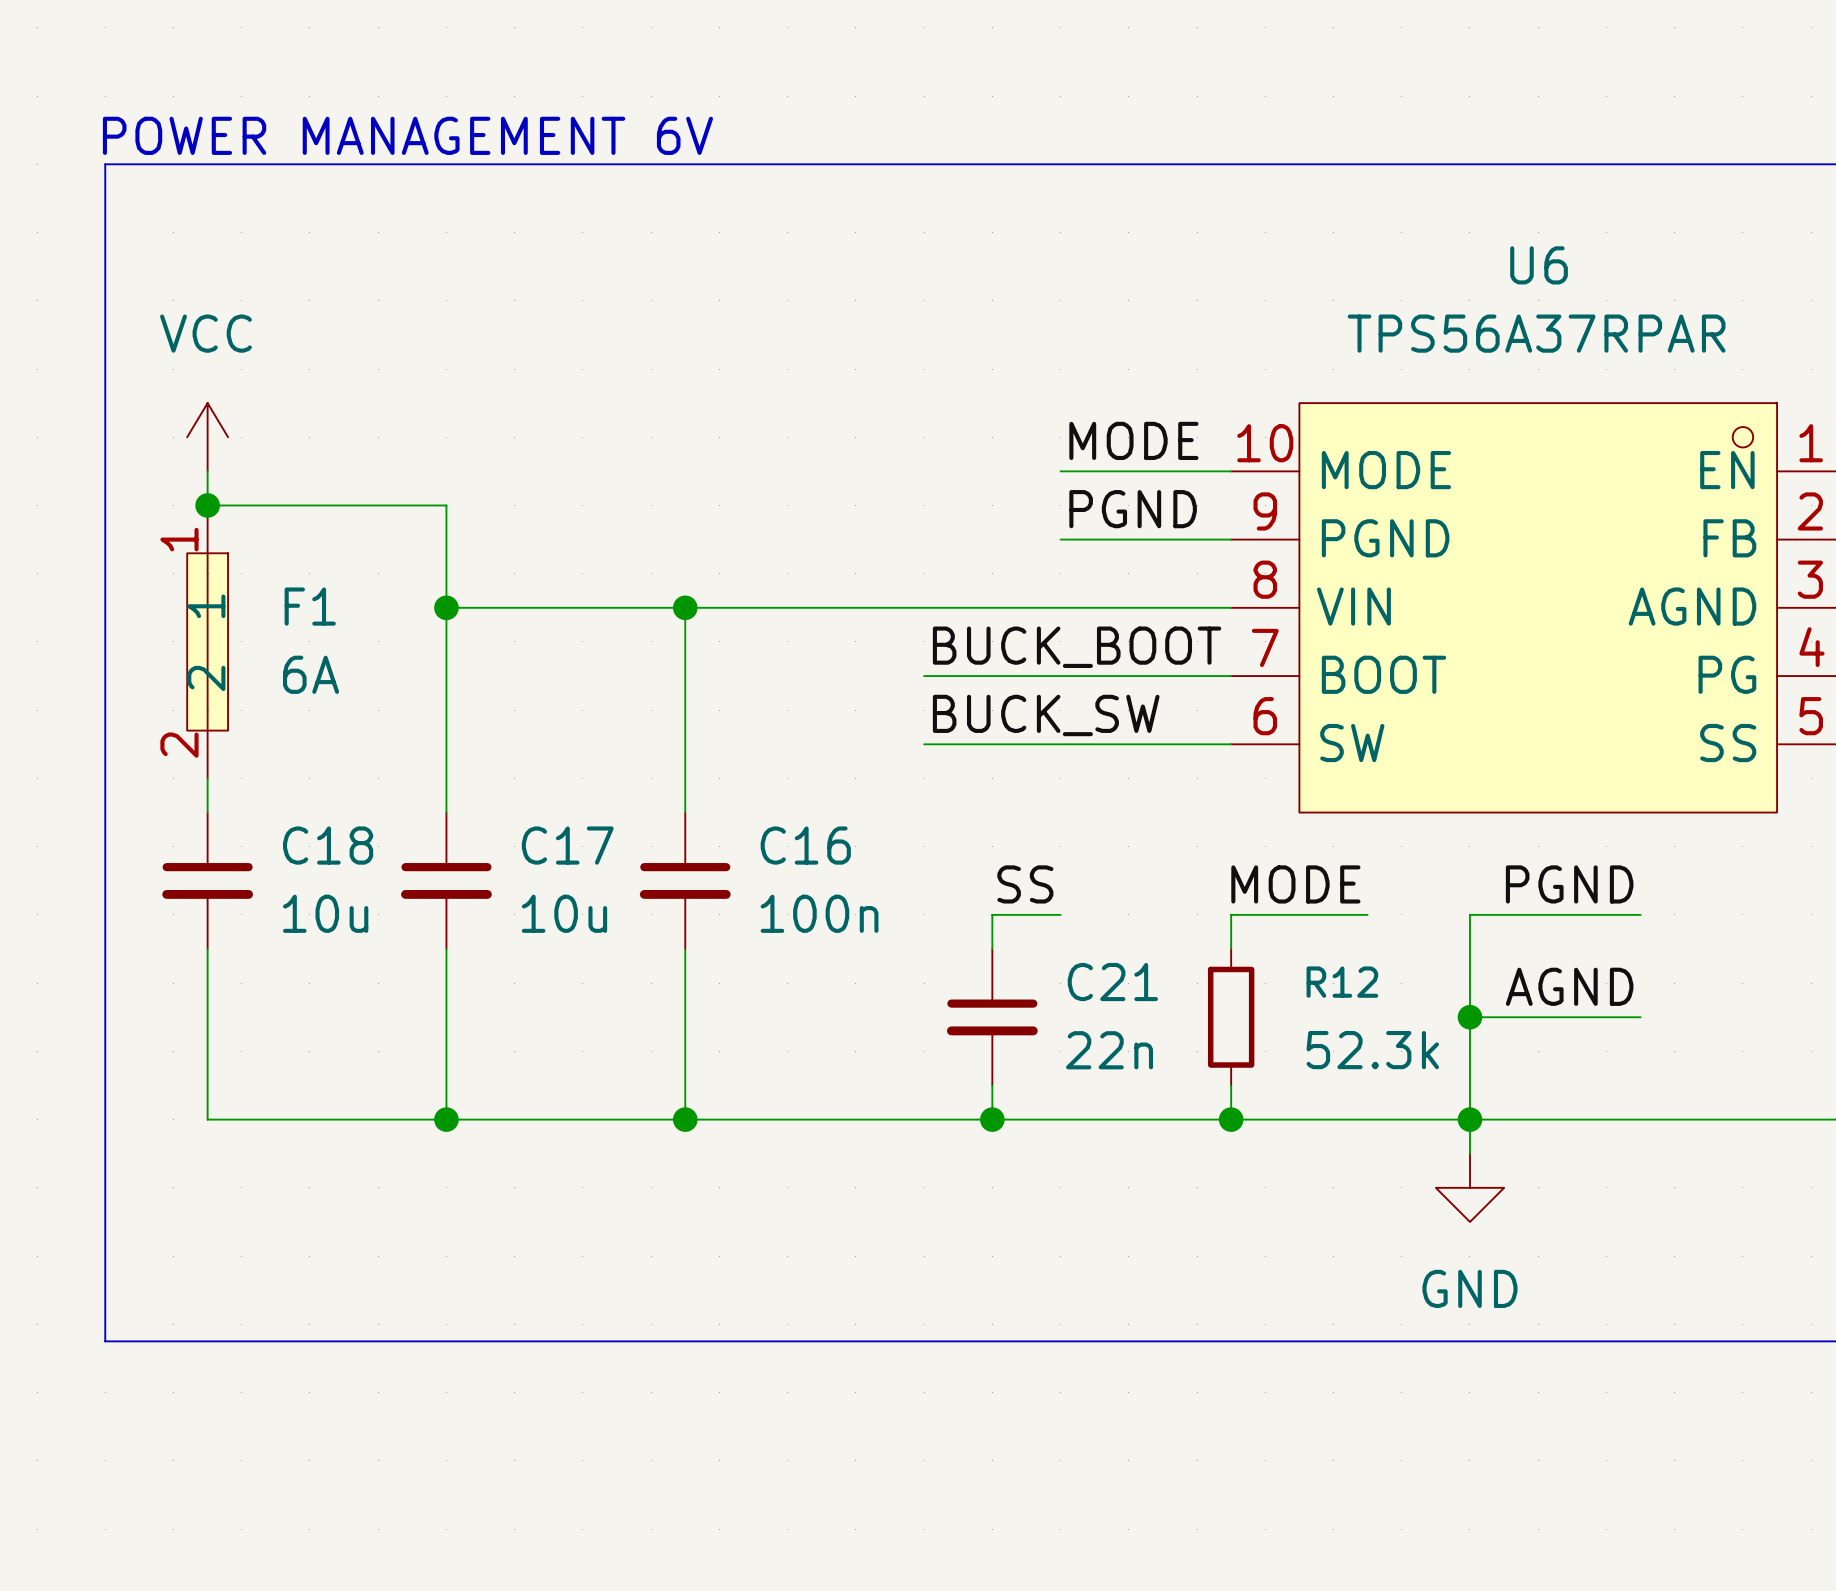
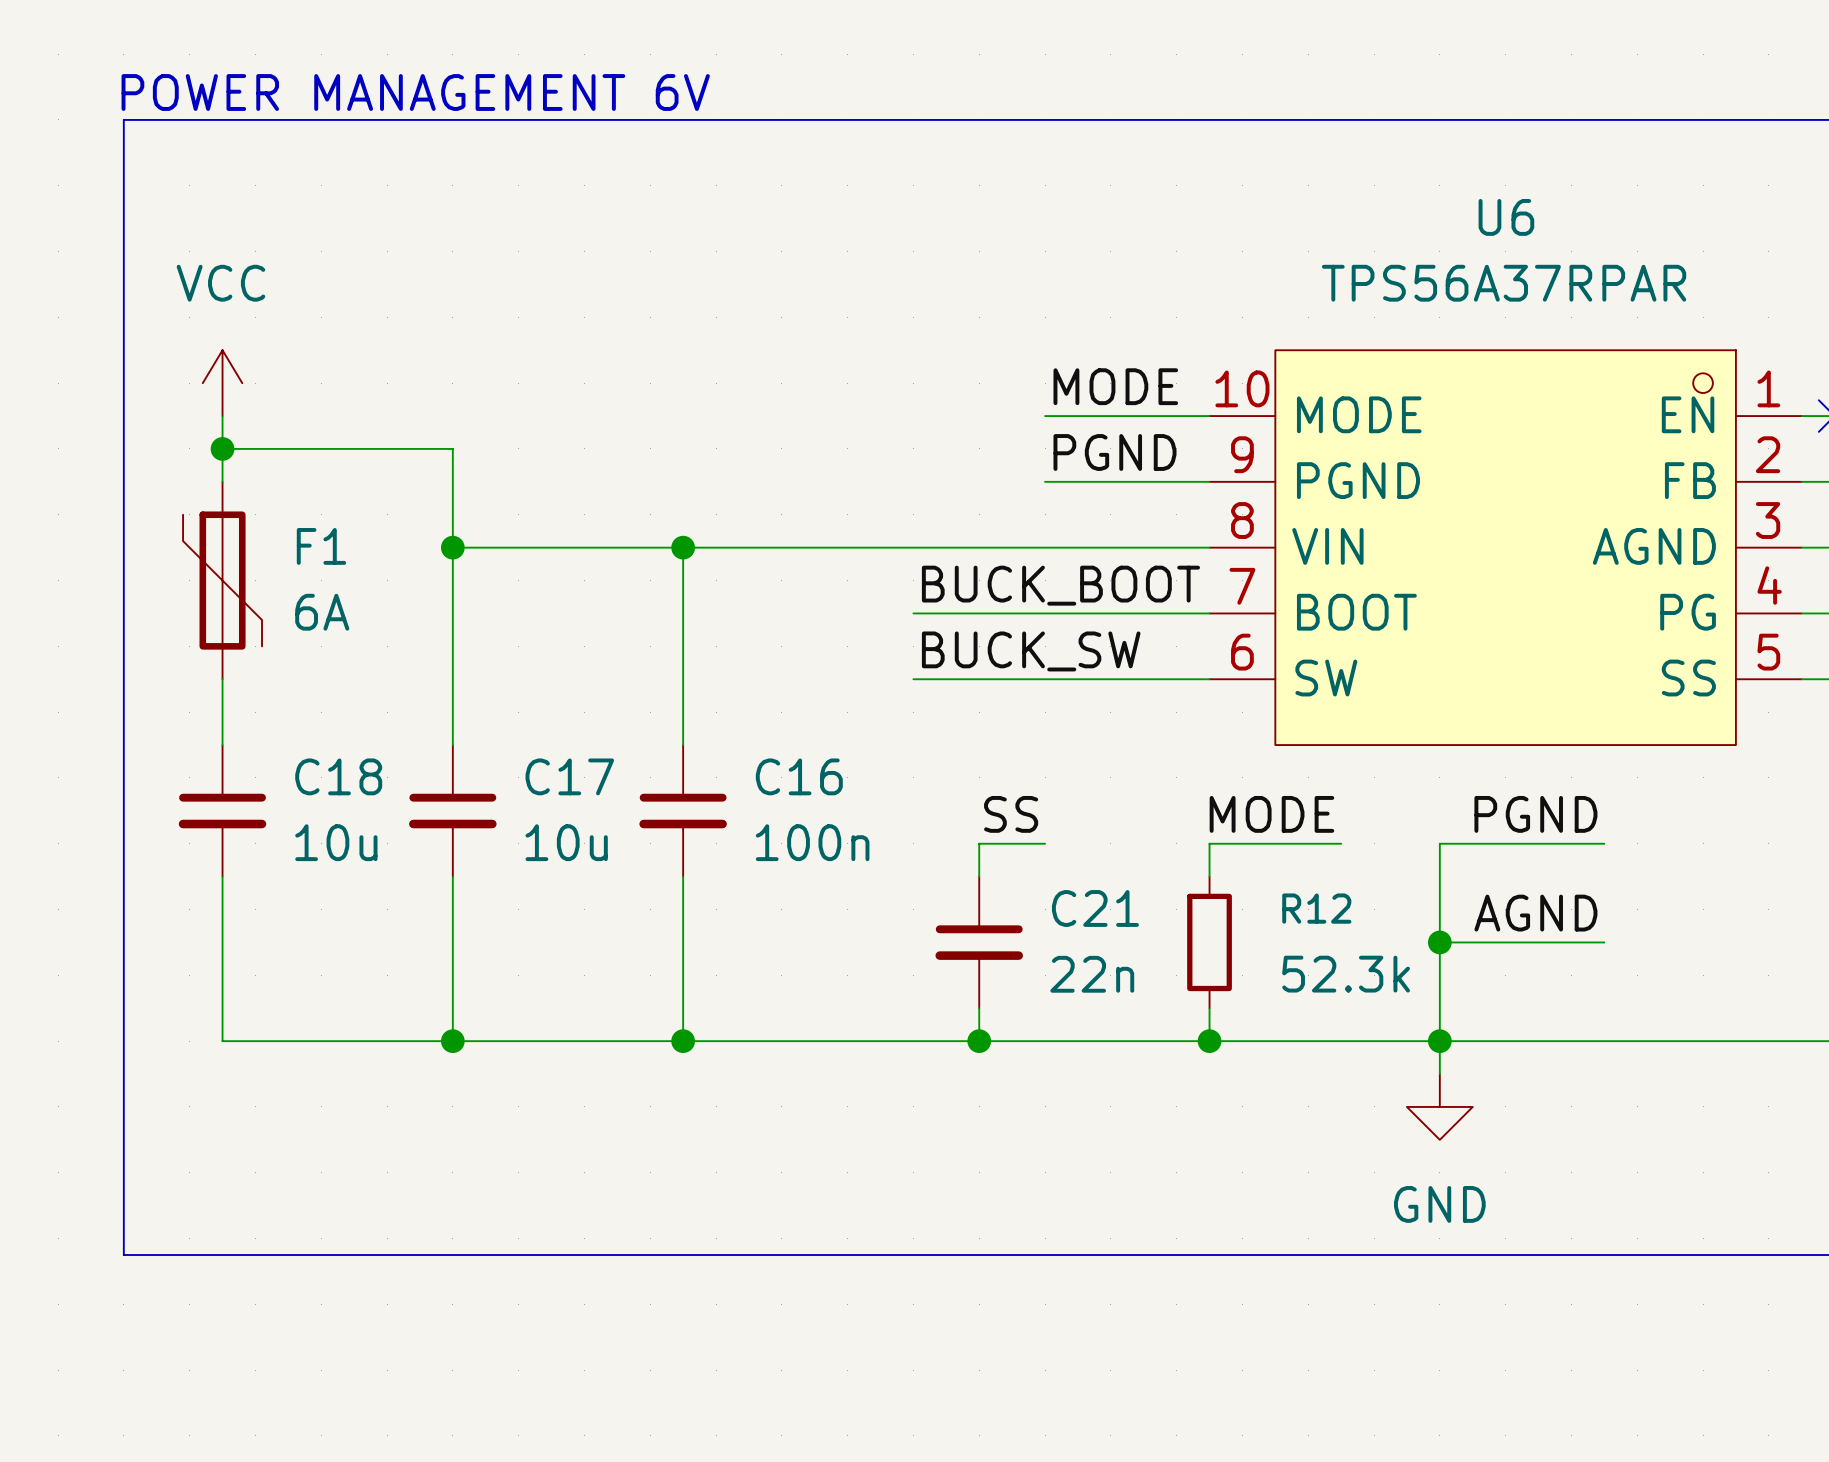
F1 symbol: [187, 505, 229, 779] -> [183, 481, 263, 680]

